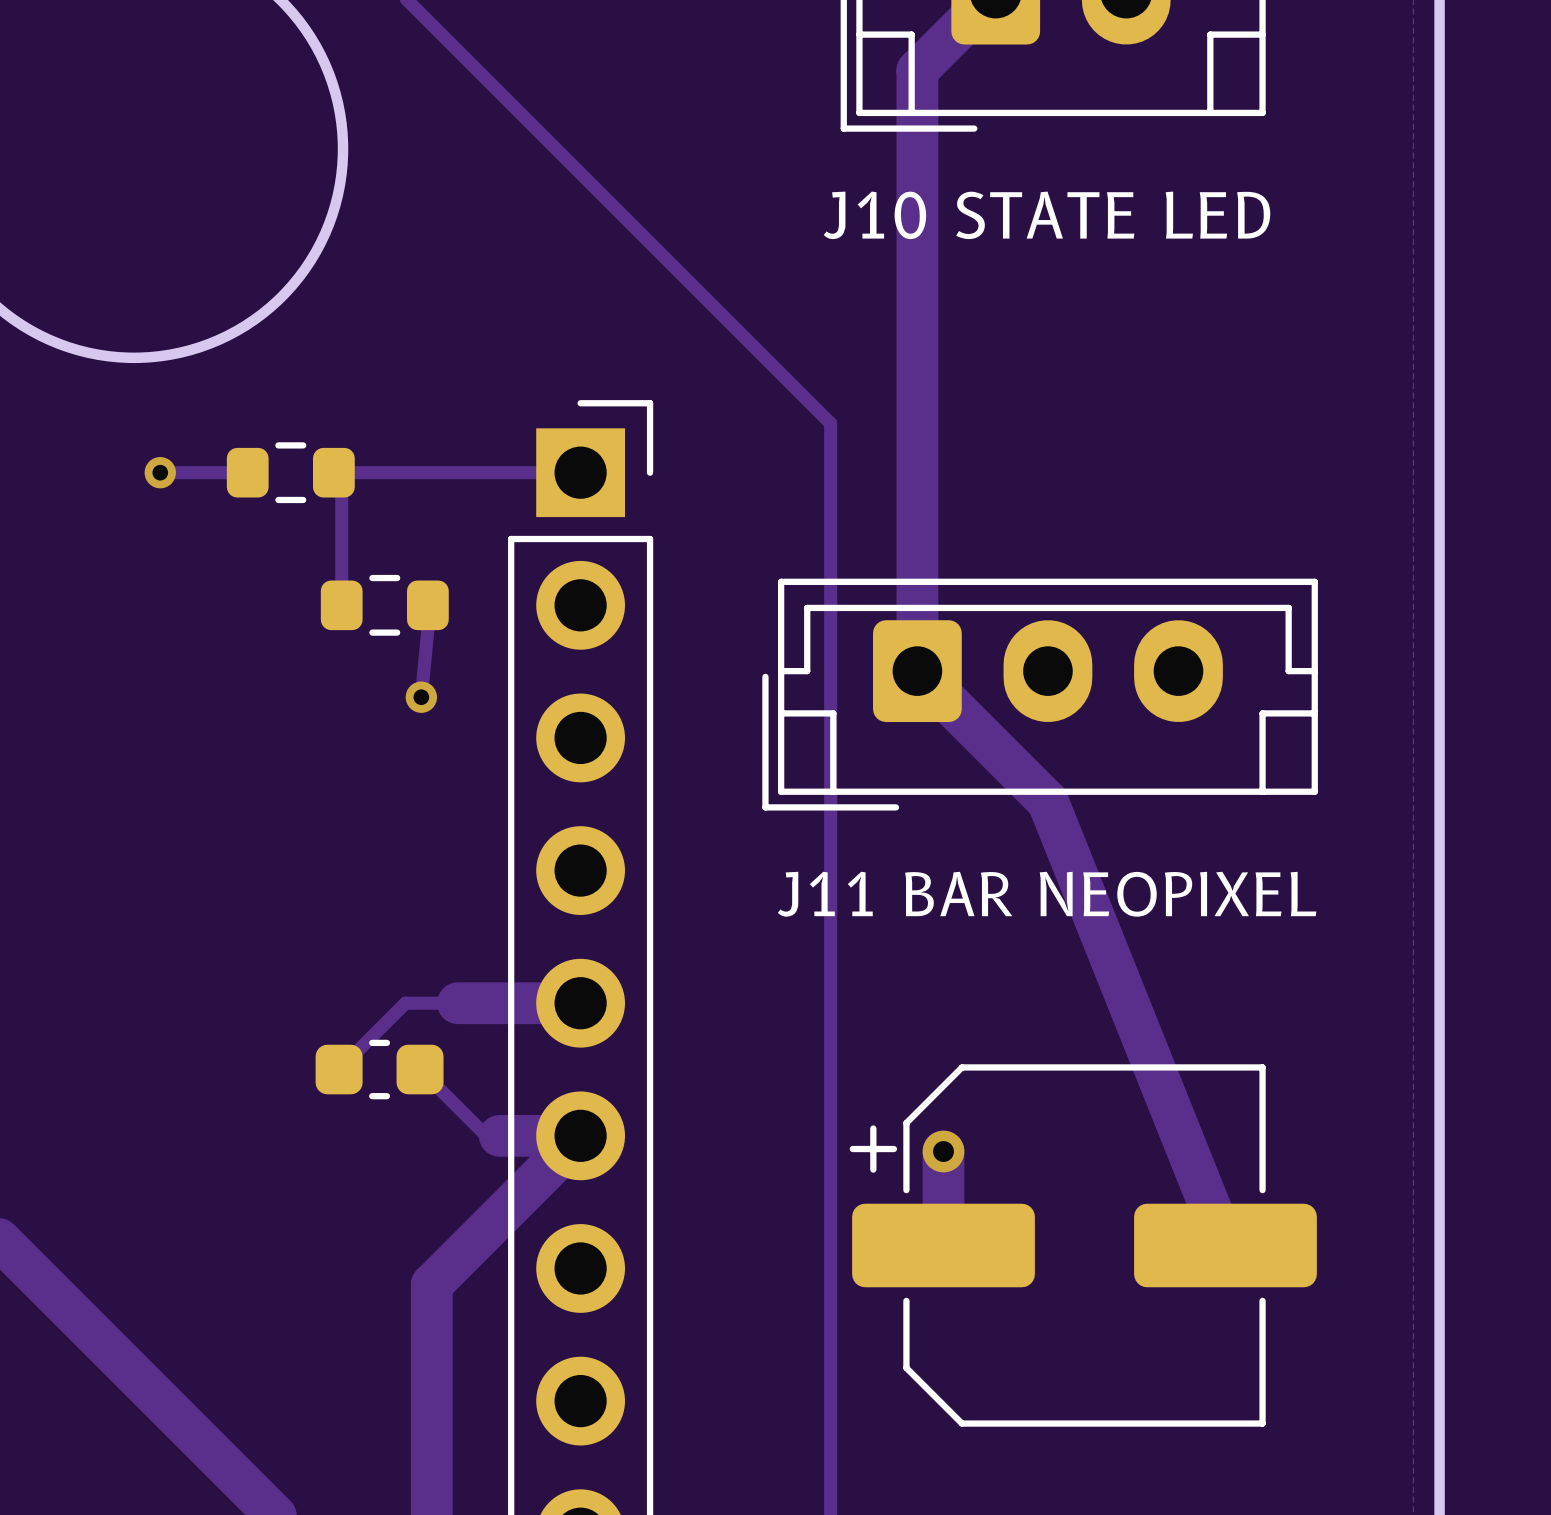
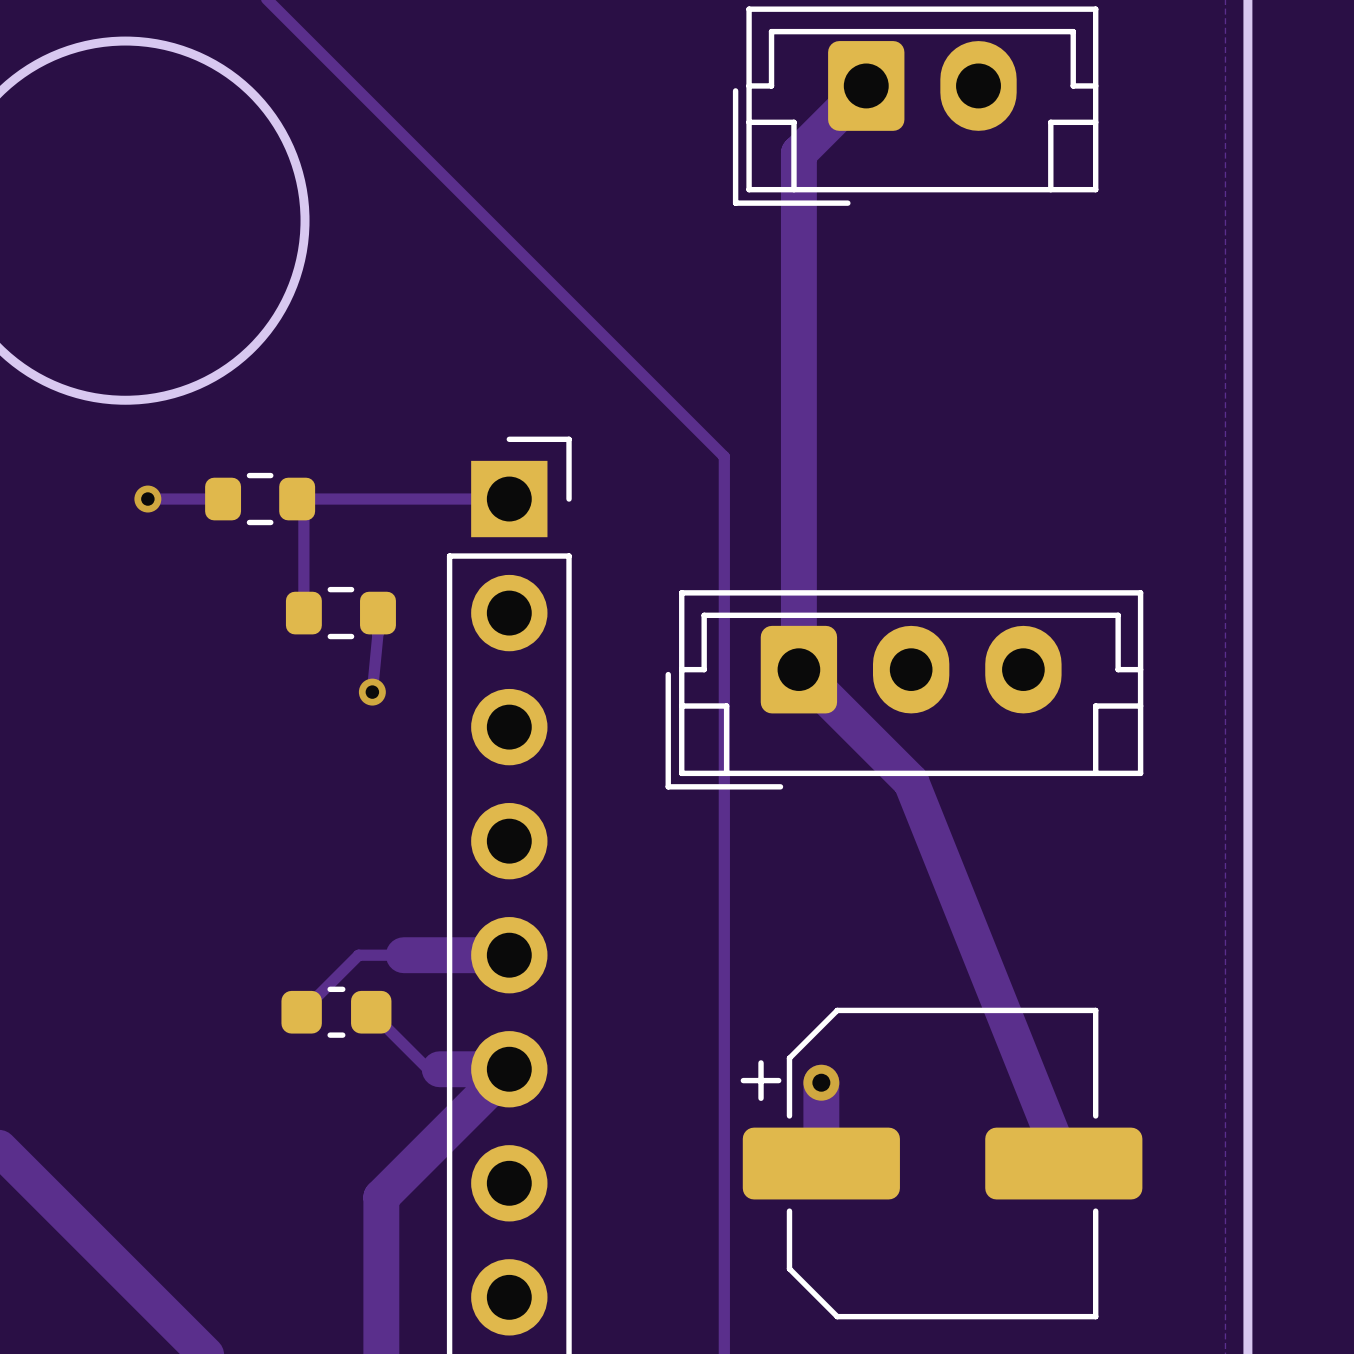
text: J10 STATE LED (1047, 215) -> none
text: J11 BAR NEOPIXEL (1047, 894) -> none

